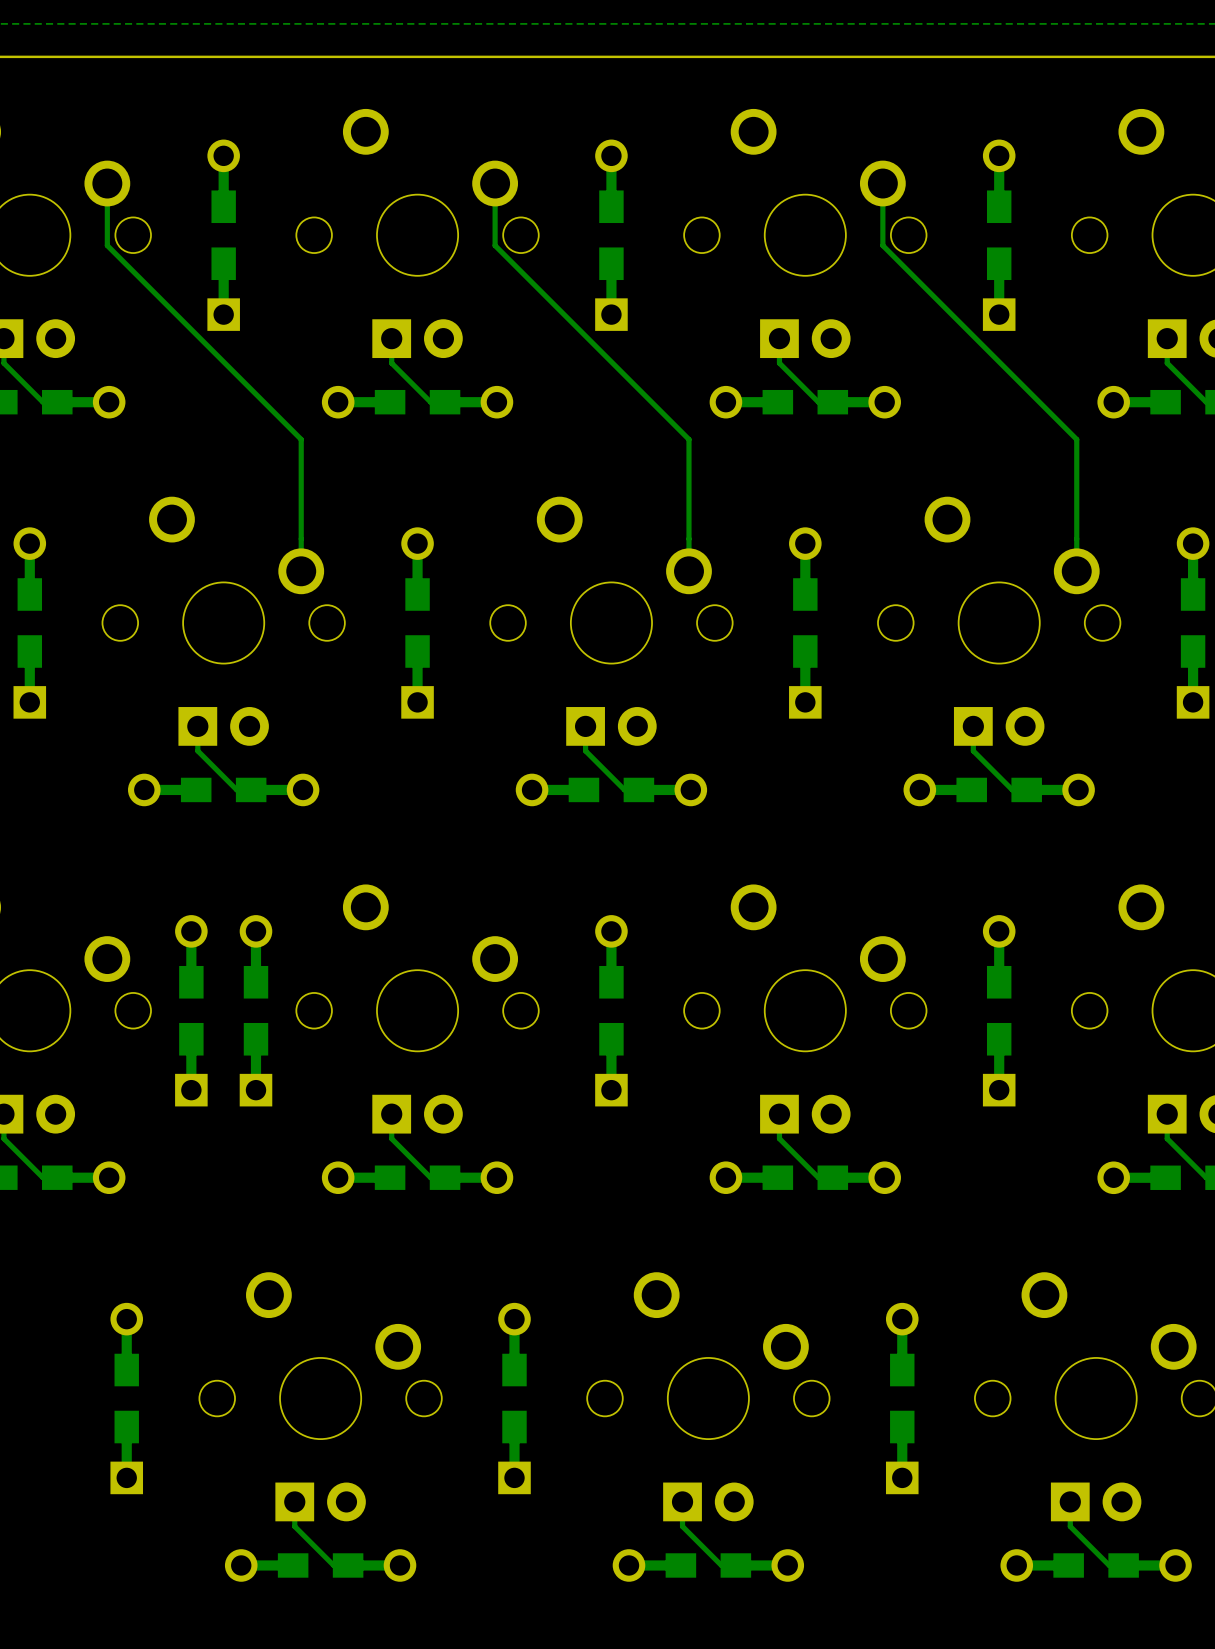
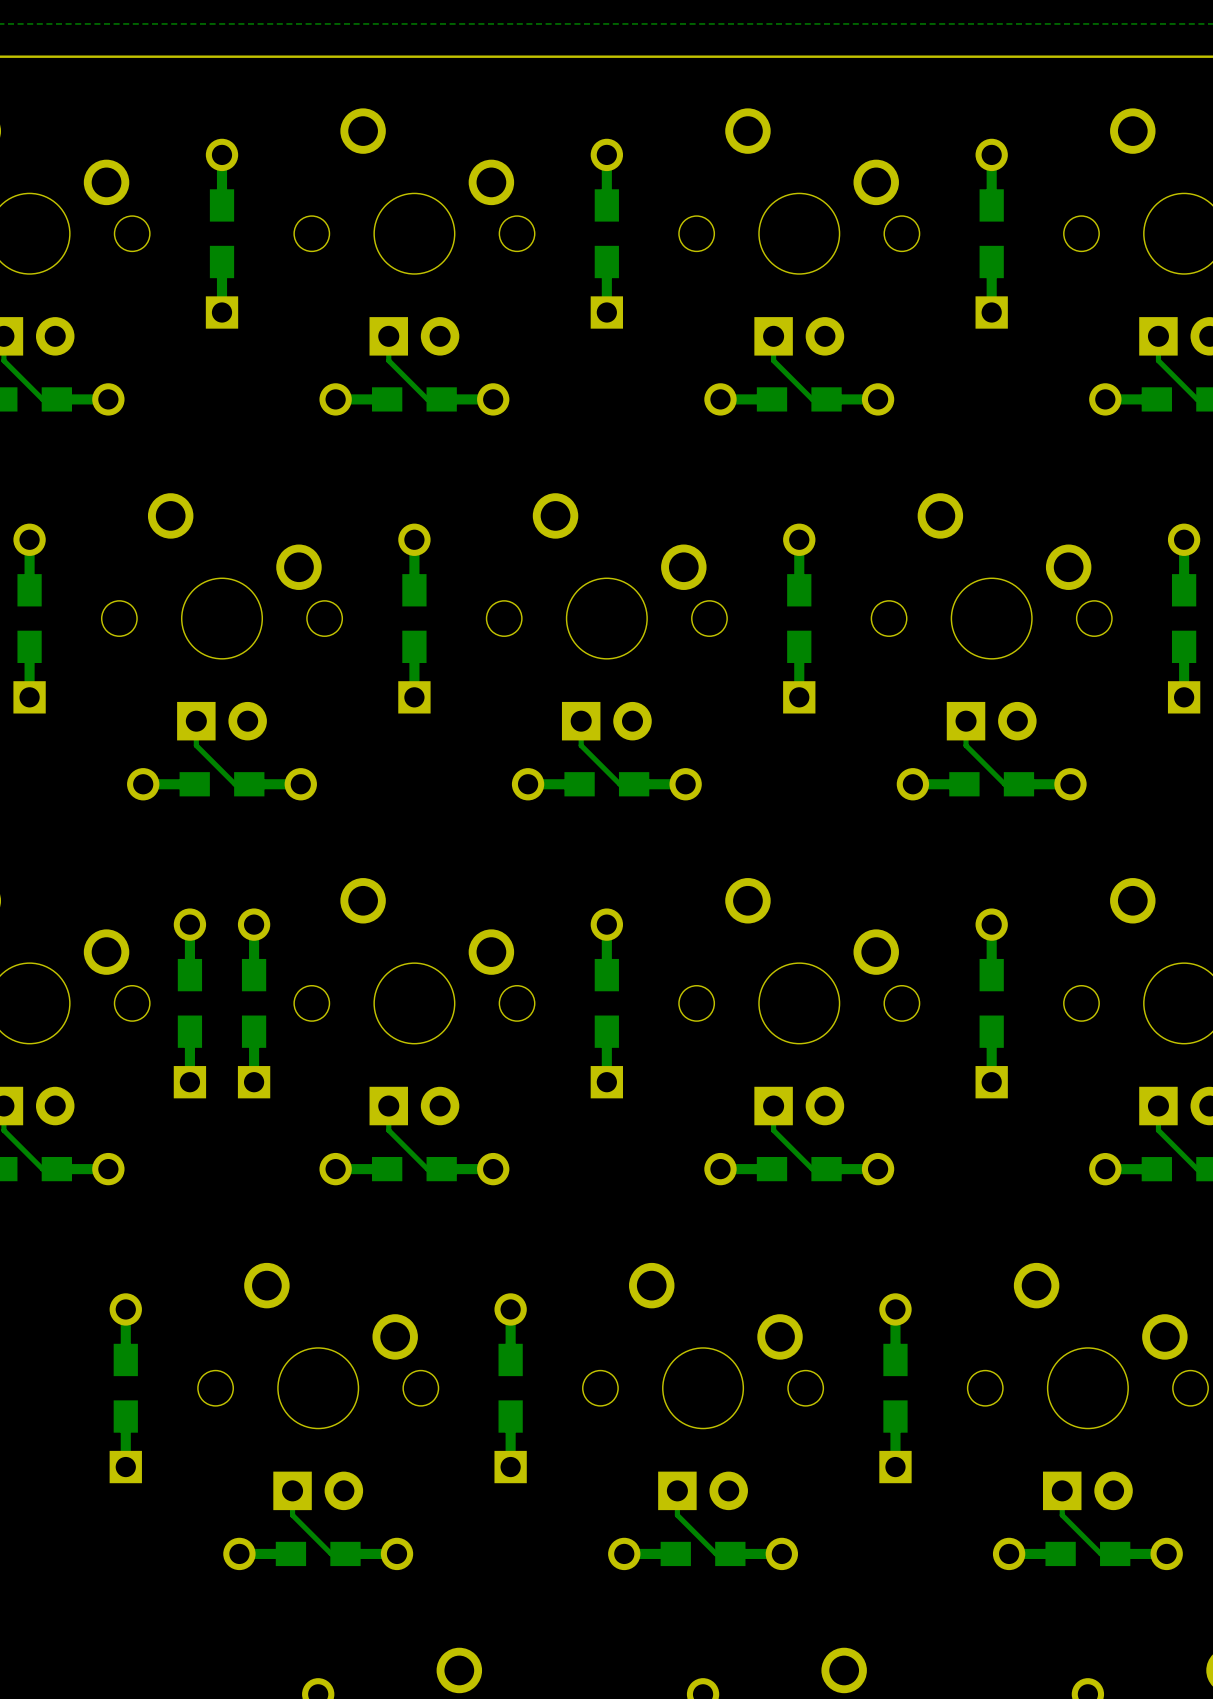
track: (107, 183) (107, 245) (301, 439) (301, 571) -> none
track: (495, 183) (495, 245) (688, 439) (688, 571) -> none
track: (882, 183) (882, 245) (1076, 439) (1076, 571) -> none

